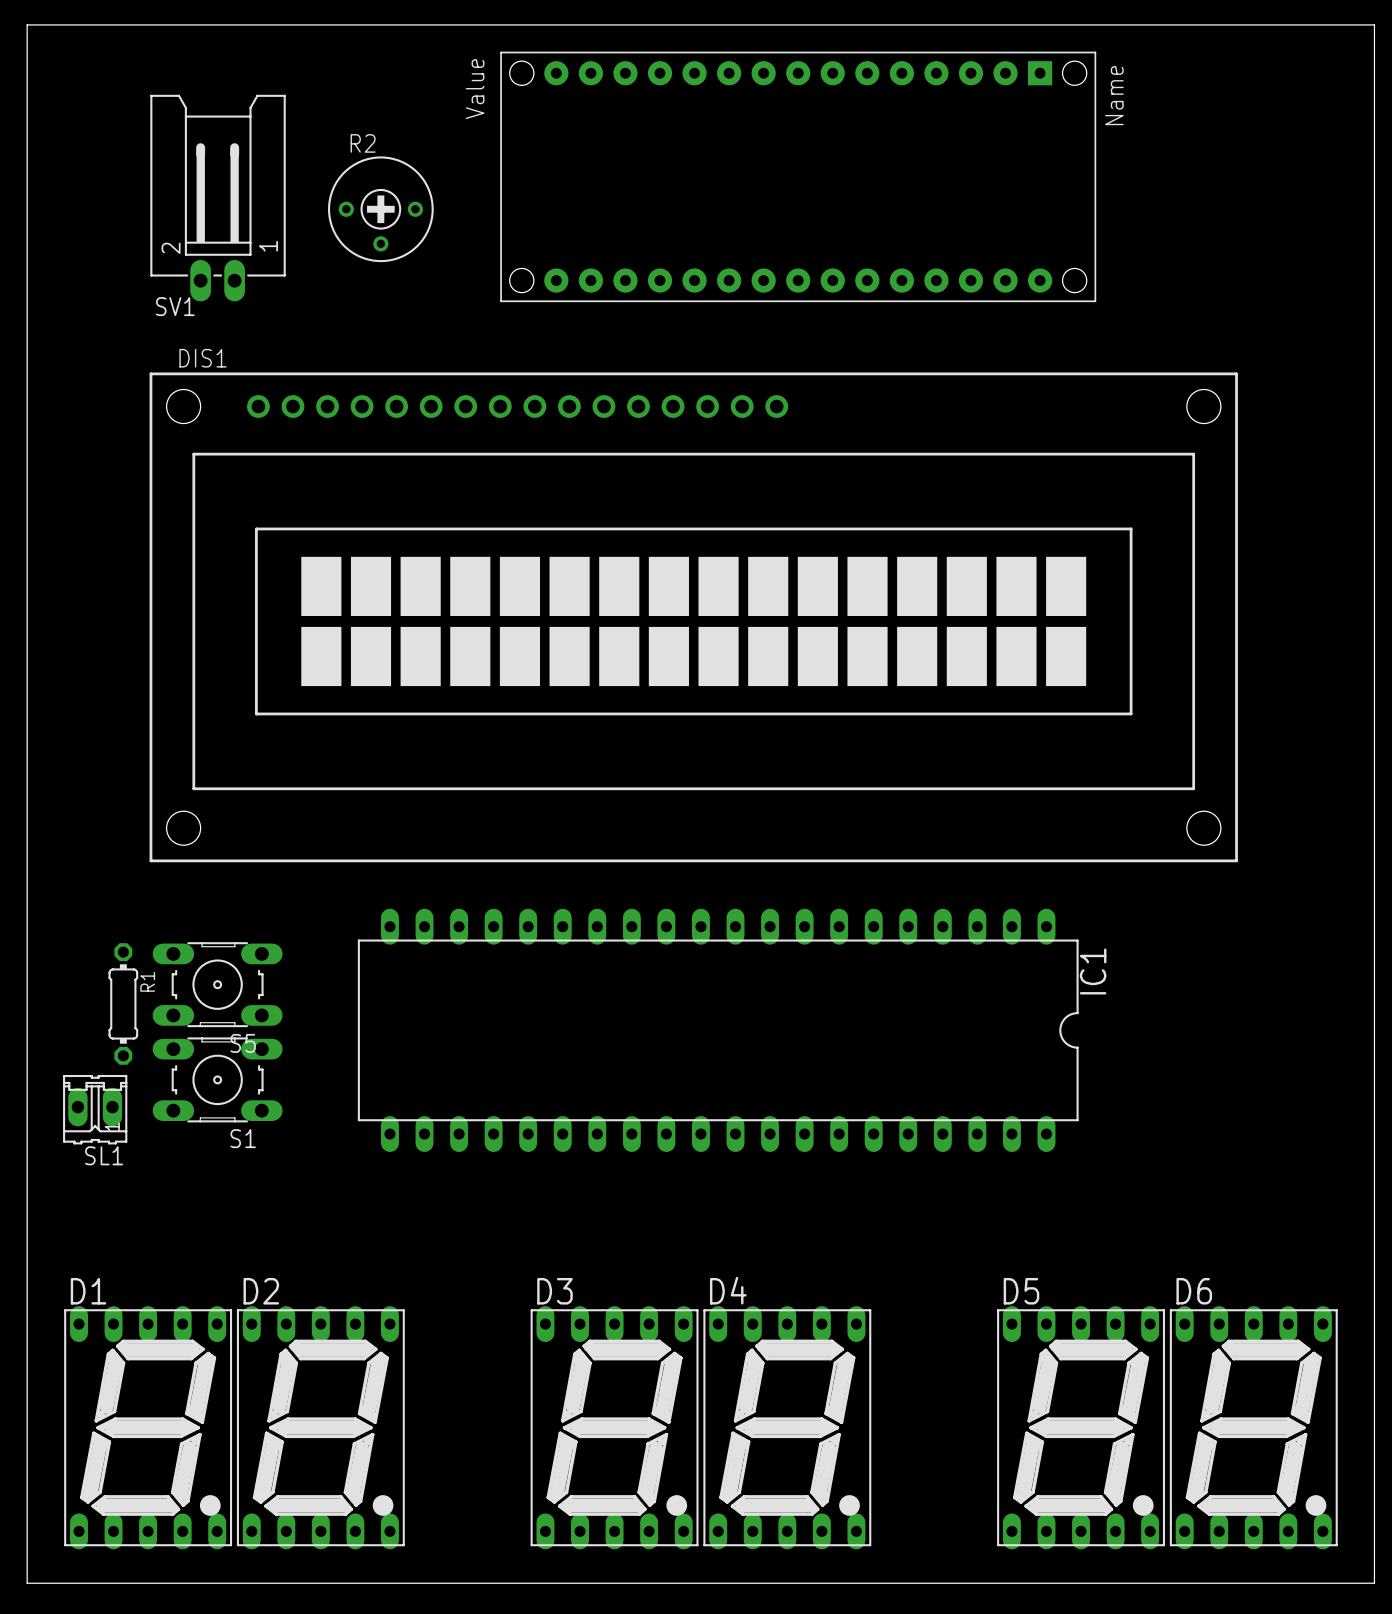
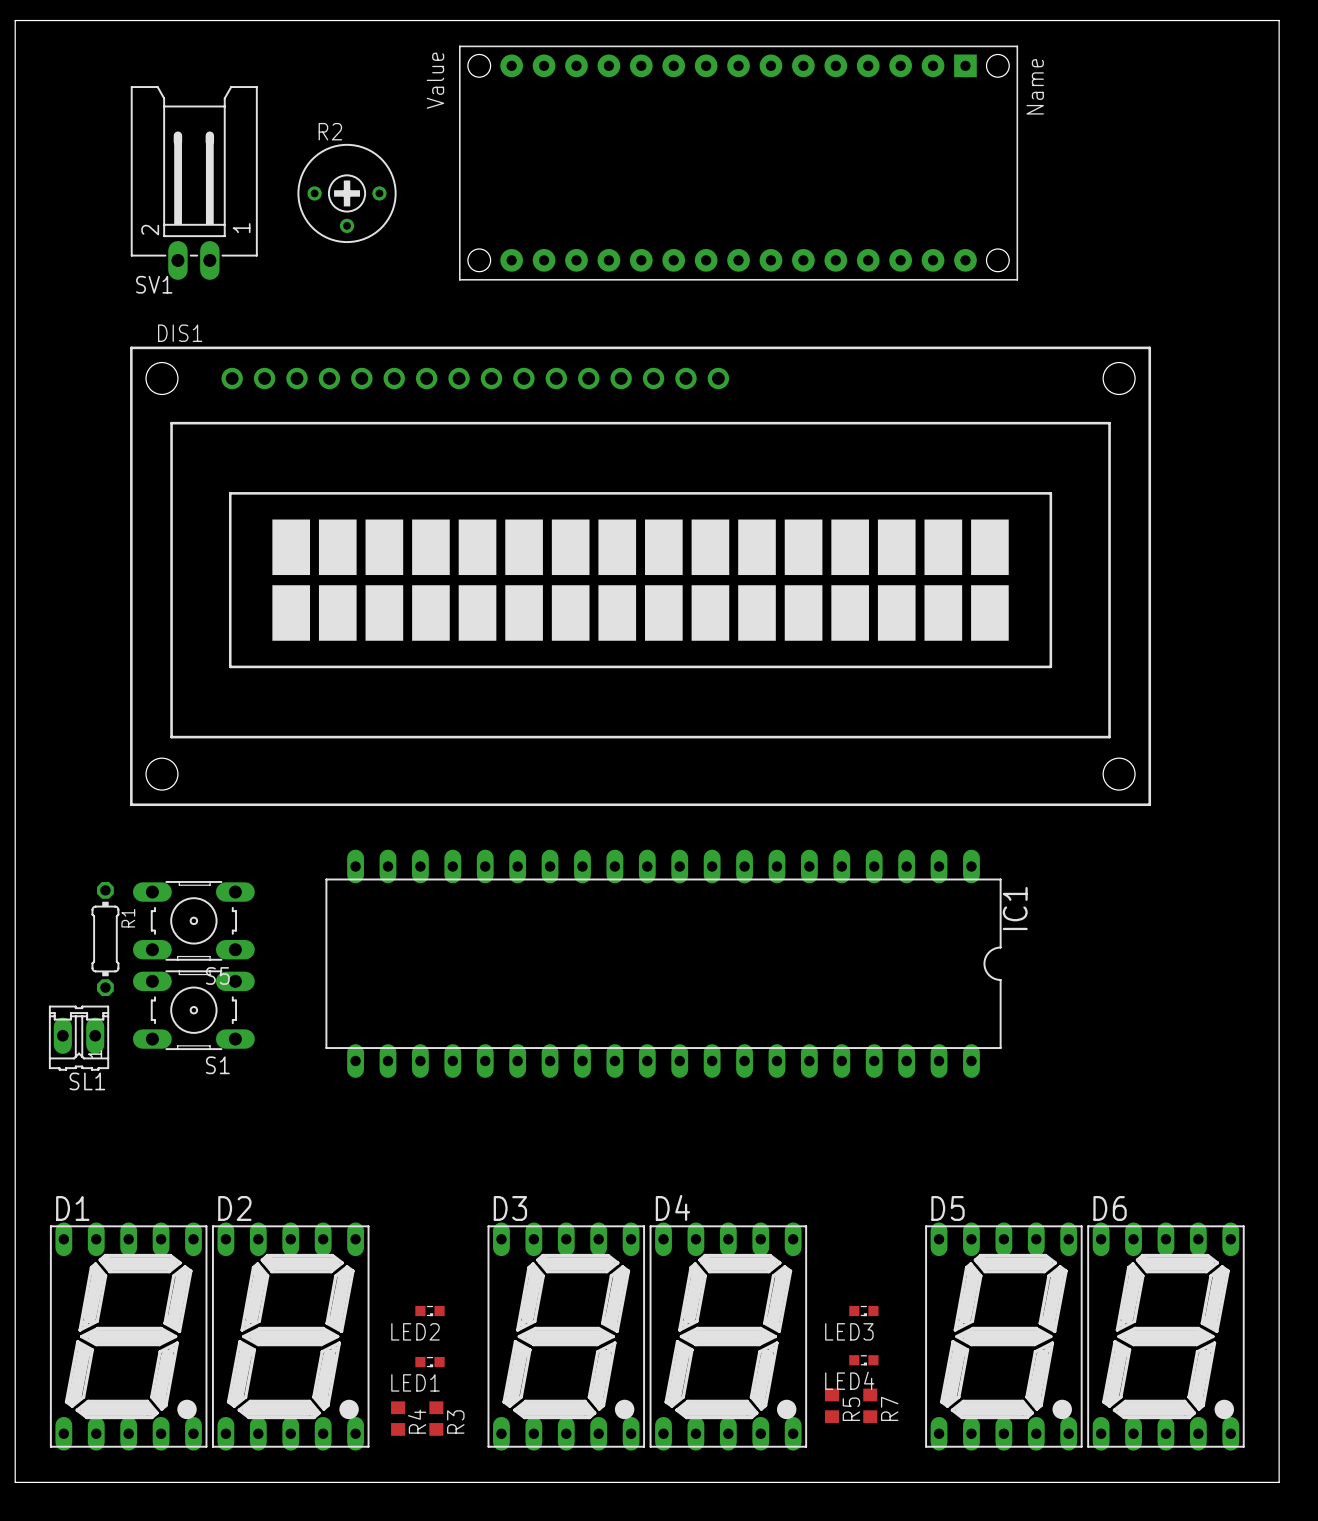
LED2: none -> (429, 1311)
LED3: none -> (863, 1311)
LED4: none -> (863, 1360)
LED1: none -> (429, 1362)
R5: none -> (831, 1405)
R7: none -> (870, 1405)
R4: none -> (398, 1418)
R3: none -> (436, 1418)

